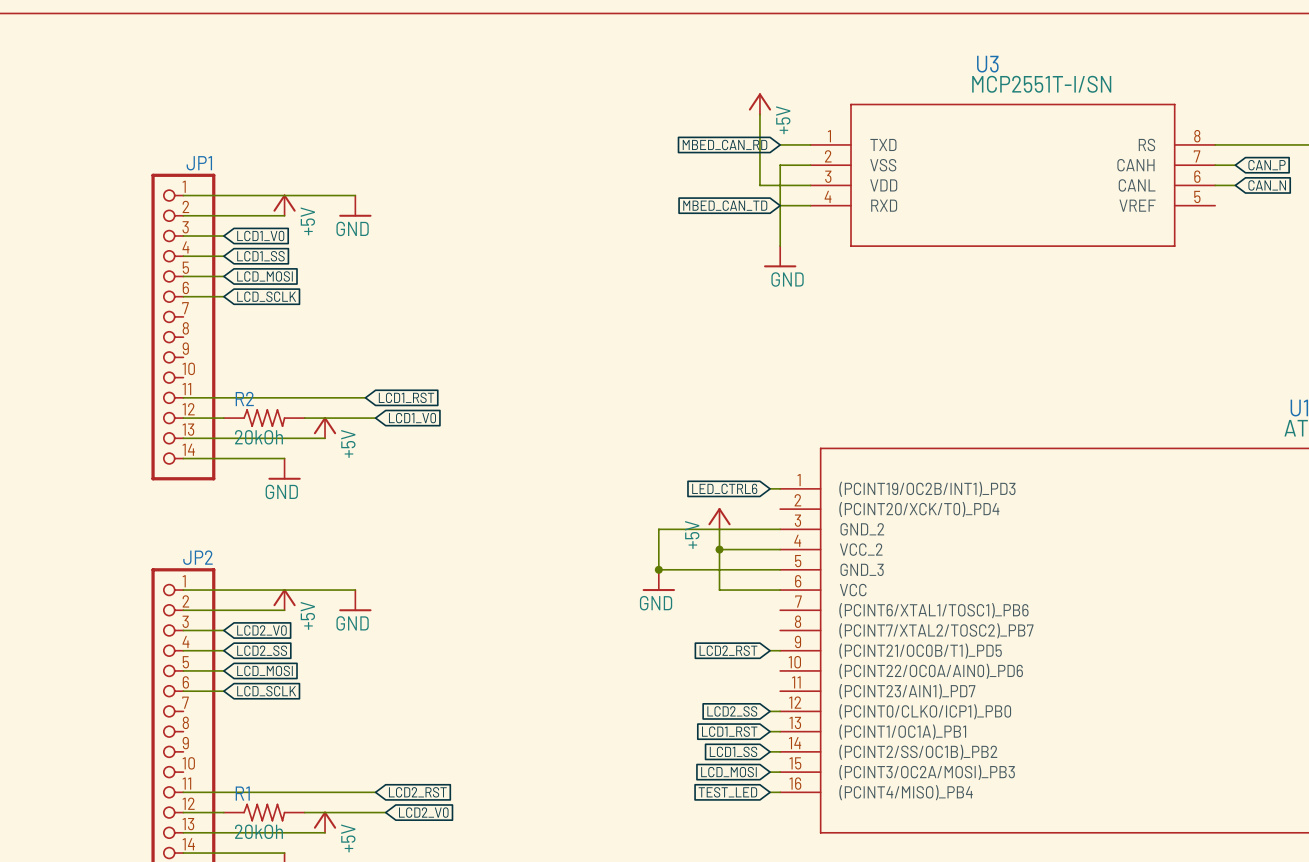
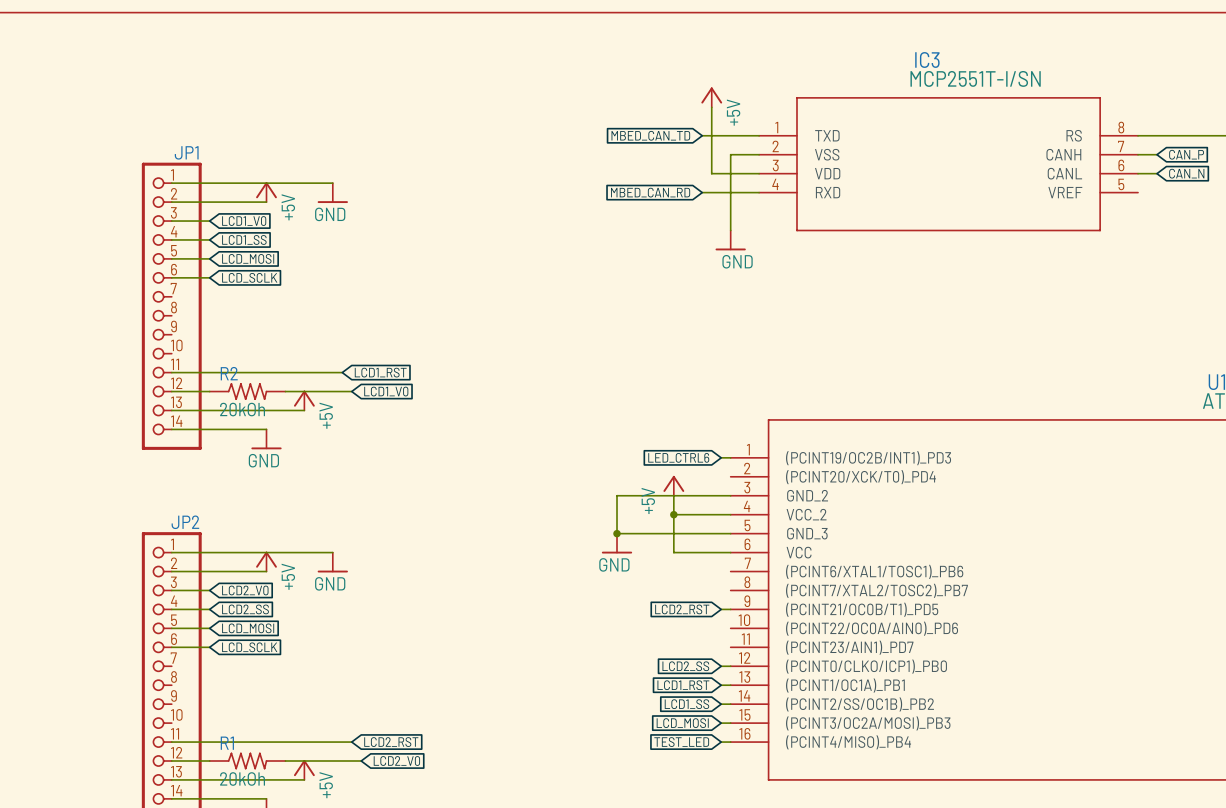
U3 name: U3 (987, 64) -> IC3 (927, 59)
global label position: MBED_CAN_RD (725, 144) -> MBED_CAN_RD (650, 192)
wire: none -> (702, 135) (730, 135)
global label position: MBED_CAN_TD (725, 205) -> MBED_CAN_TD (650, 135)
wire: none -> (702, 192) (730, 192)

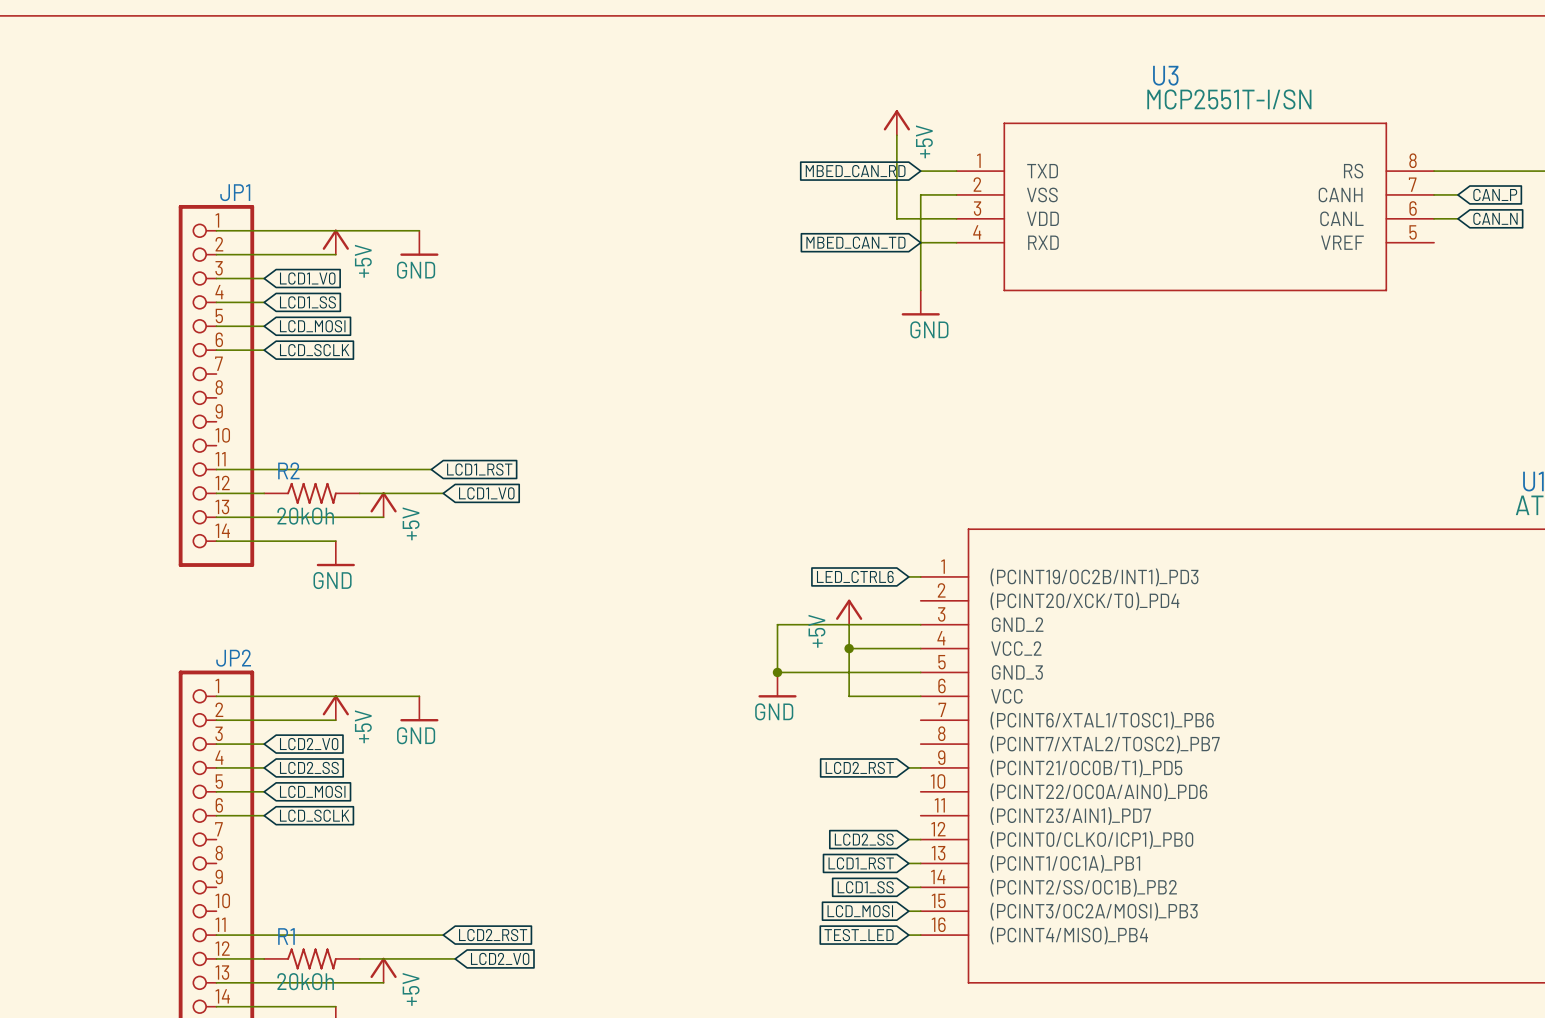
IC3 name: IC3 (927, 59) -> U3 (1165, 75)
global label position: MBED_CAN_TD (650, 135) -> MBED_CAN_TD (855, 242)
wire: (702, 135) (730, 135) -> none
global label position: MBED_CAN_RD (650, 192) -> MBED_CAN_RD (855, 171)
wire: (702, 192) (730, 192) -> none

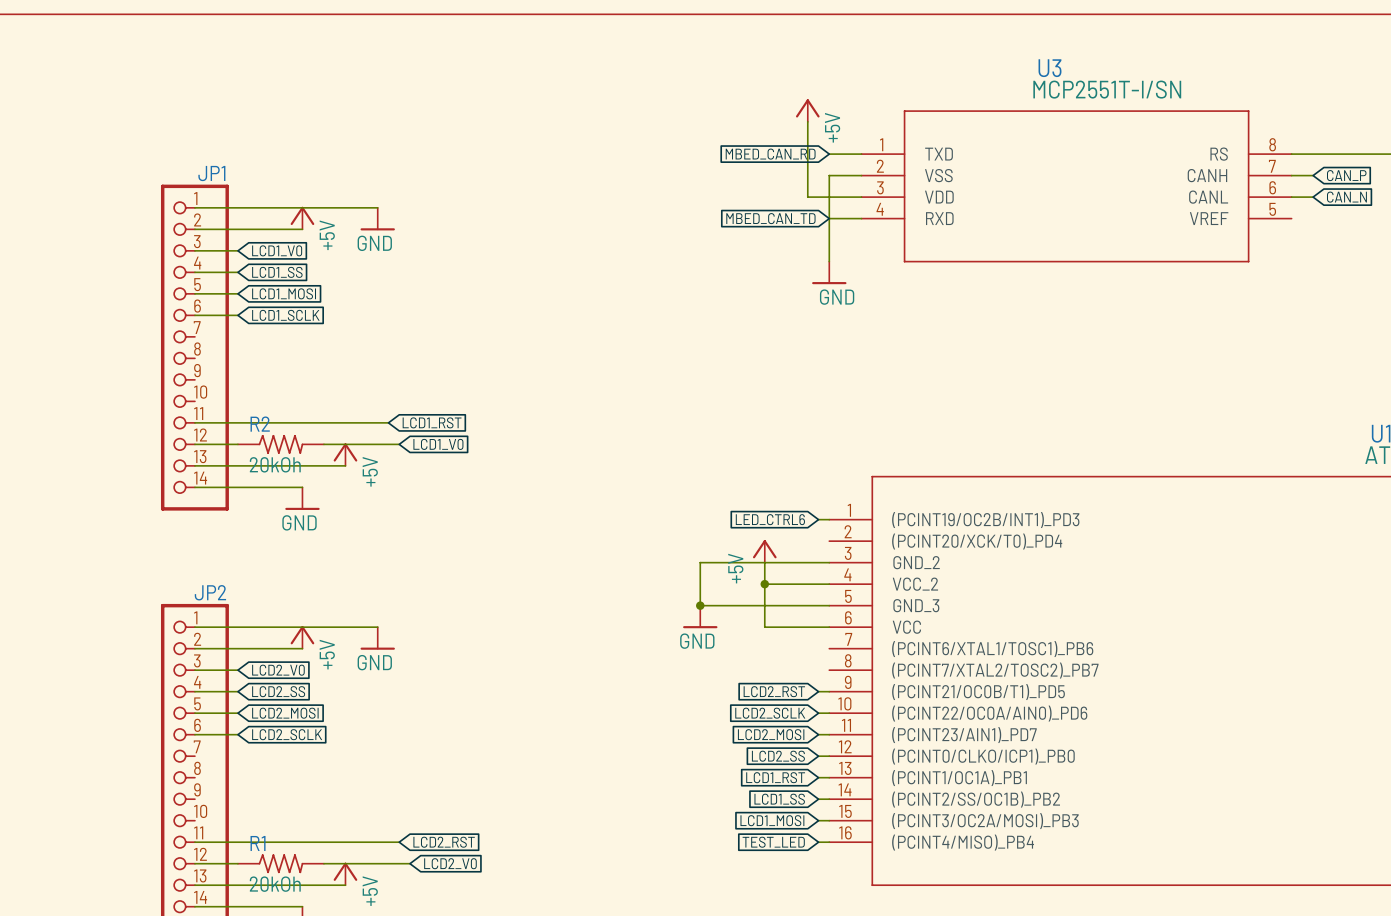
global label: LCD_MOSI (312, 326) -> LCD1_MOSI (284, 293)
global label: LCD_SCLK (314, 350) -> LCD1_SCLK (285, 315)
global label: LCD_MOSI (312, 791) -> LCD2_MOSI (285, 713)
global label: none -> LCD2_SCLK (770, 713)
wire: none -> (818, 713) (829, 713)
global label: LCD_SCLK (314, 815) -> LCD2_SCLK (287, 734)
global label: none -> LCD2_MOSI (771, 734)
wire: none -> (818, 734) (829, 734)
global label: LCD_MOSI (860, 911) -> LCD1_MOSI (772, 820)

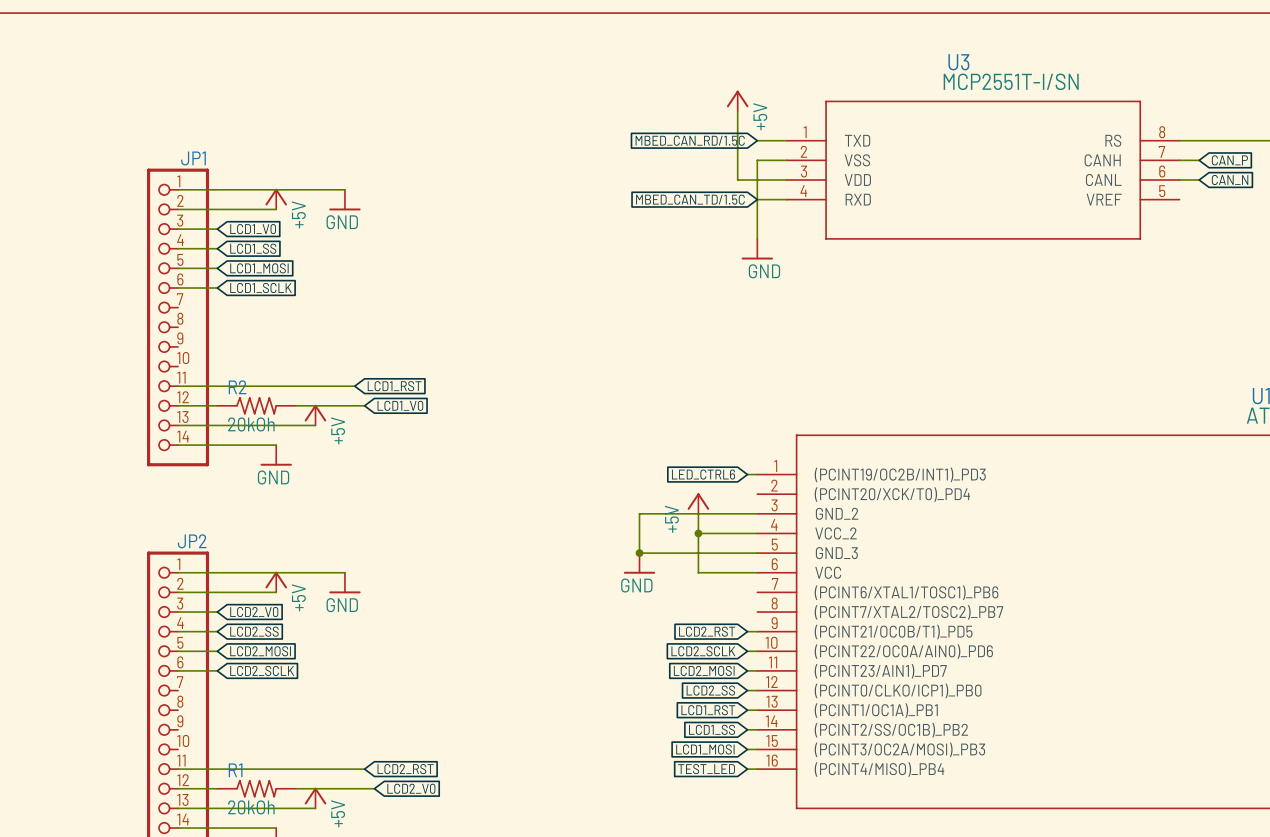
global label: MBED_CAN_RD (770, 154) -> MBED_CAN_RD/1.5C (690, 140)
global label: MBED_CAN_TD (770, 218) -> MBED_CAN_TD/1.5C (690, 199)

